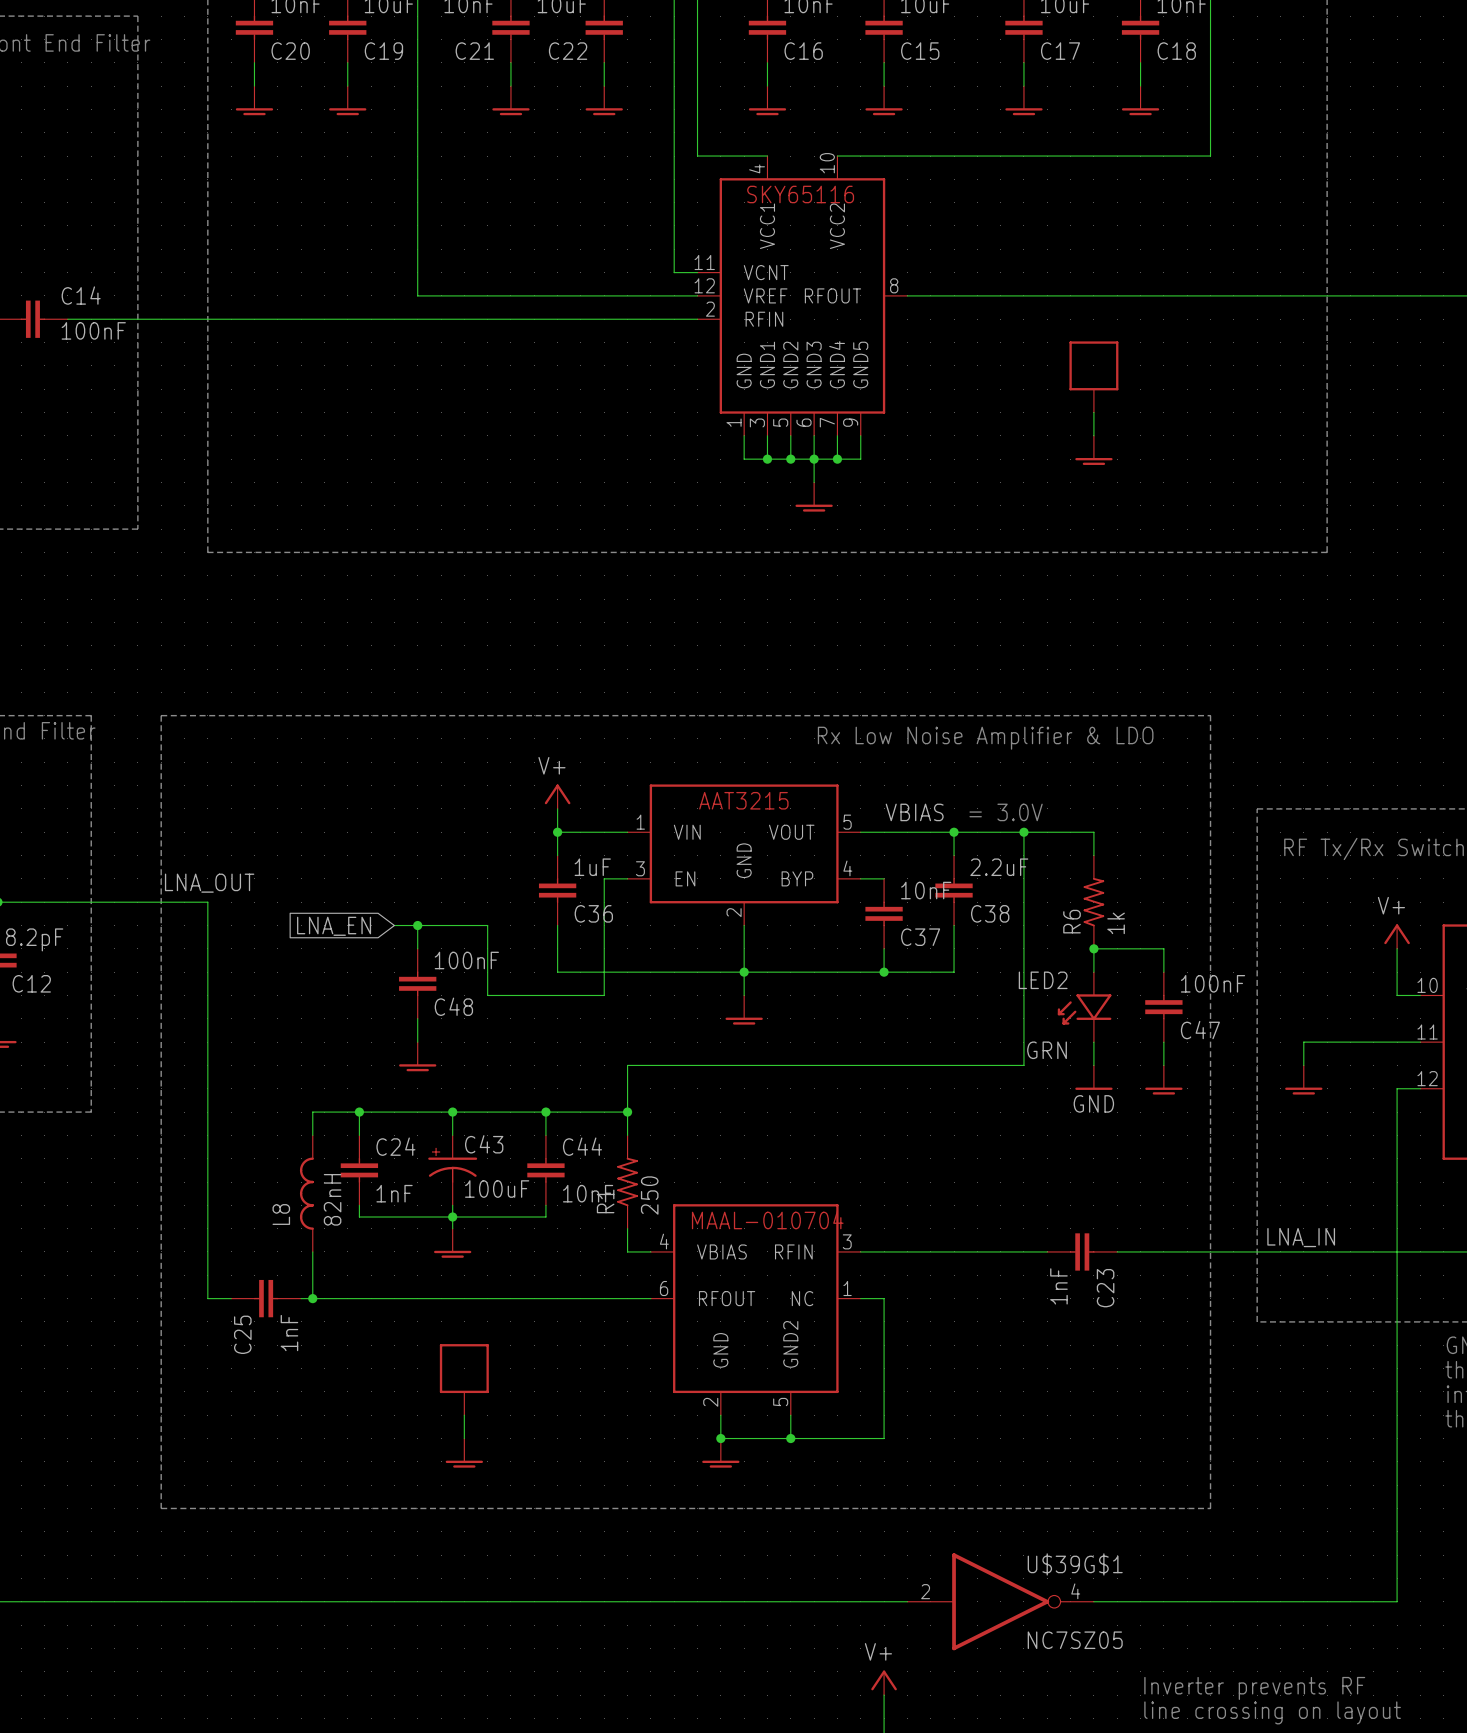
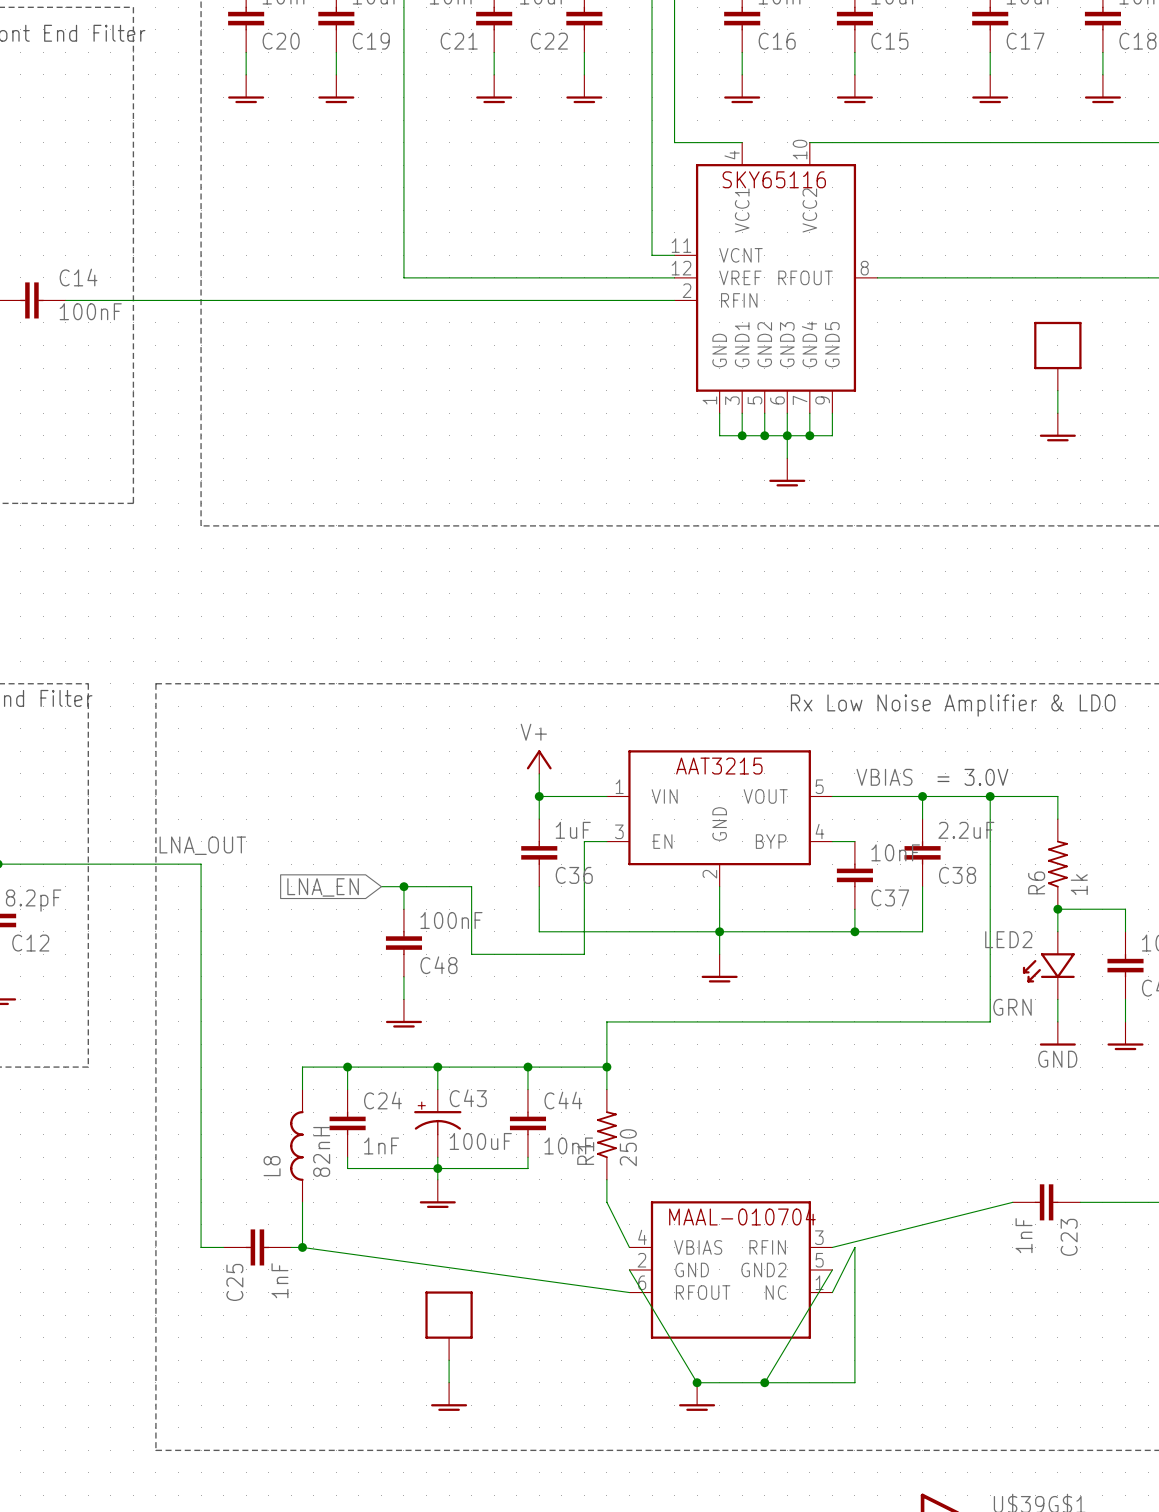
wire: (627, 1251) (650, 1251) -> (606, 1202) (629, 1247)
wire: (860, 1251) (1047, 1251) -> (832, 1247) (1012, 1202)
wire: (312, 1298) (650, 1298) -> (302, 1247) (629, 1292)
wire: (860, 1298) (884, 1298) -> (832, 1292) (854, 1247)
part: (755, 1309) -> none
part: none -> (730, 1269)
wire: (720, 1415) (720, 1438) -> (629, 1269) (697, 1382)
wire: (790, 1415) (790, 1438) -> (832, 1269) (764, 1382)

